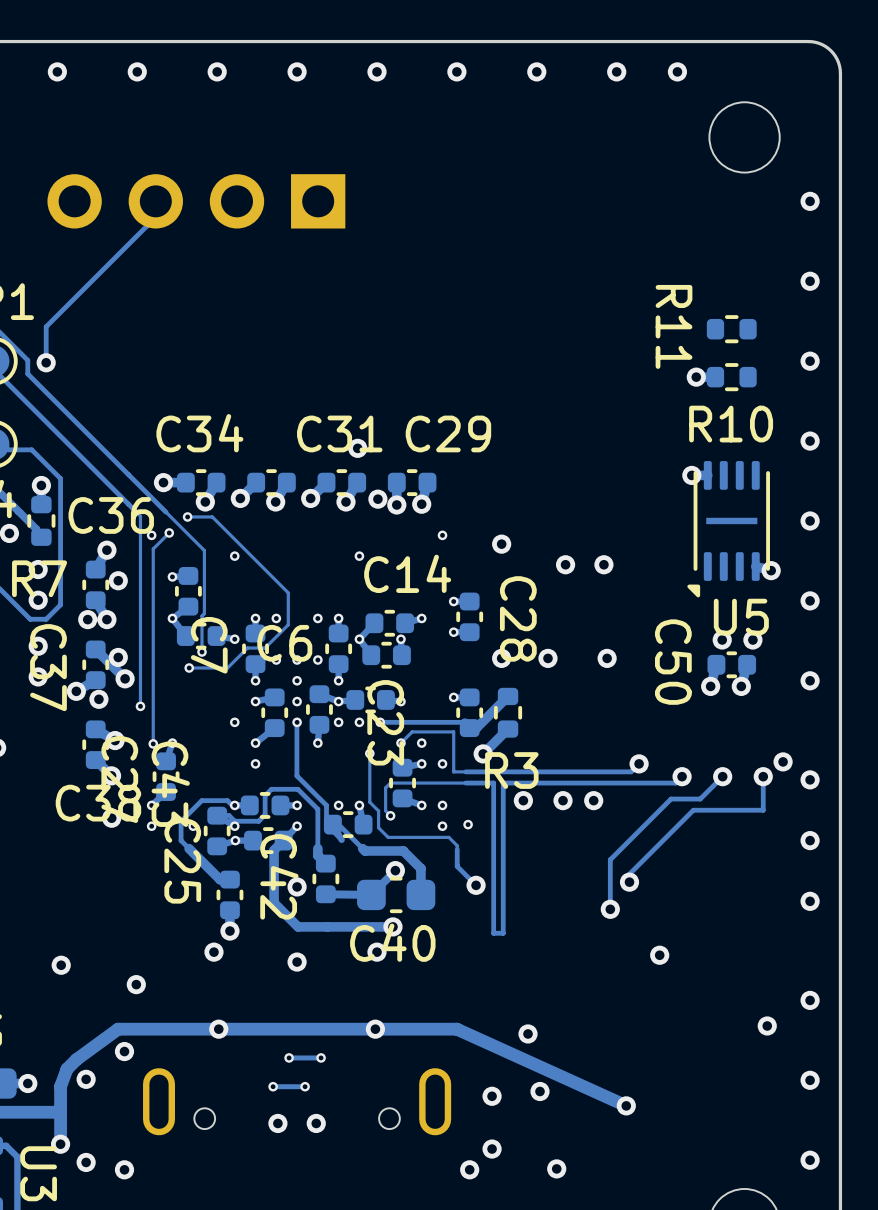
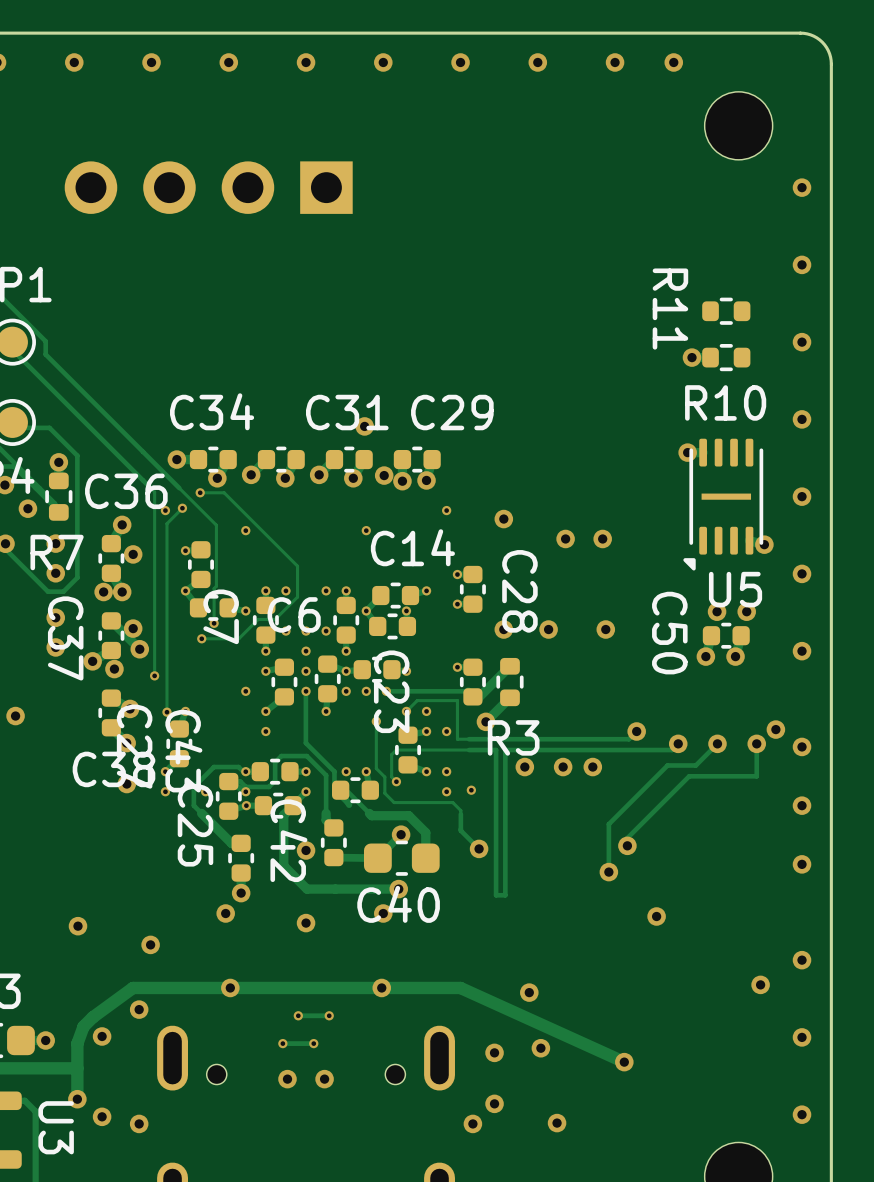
track: (155, 201) (146, 226) (46, 326) (46, 362) -> none
via: (46, 362) -> none

